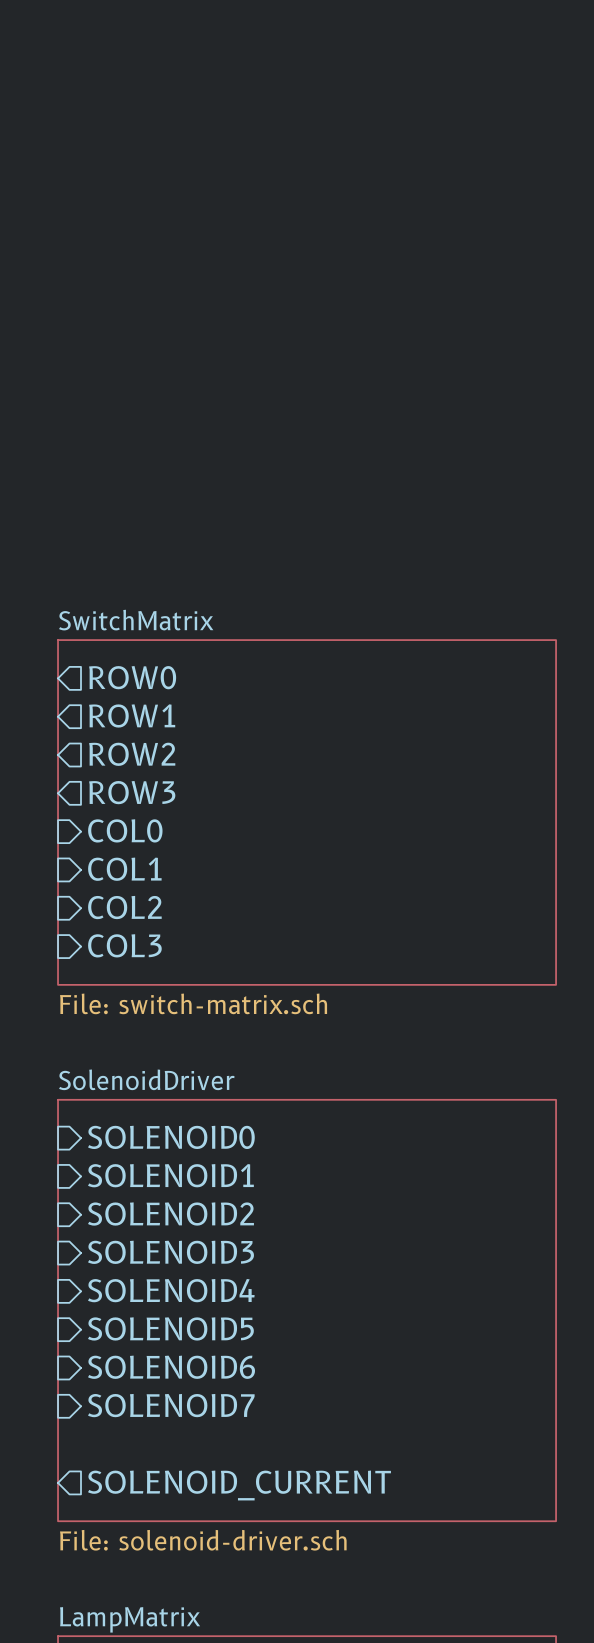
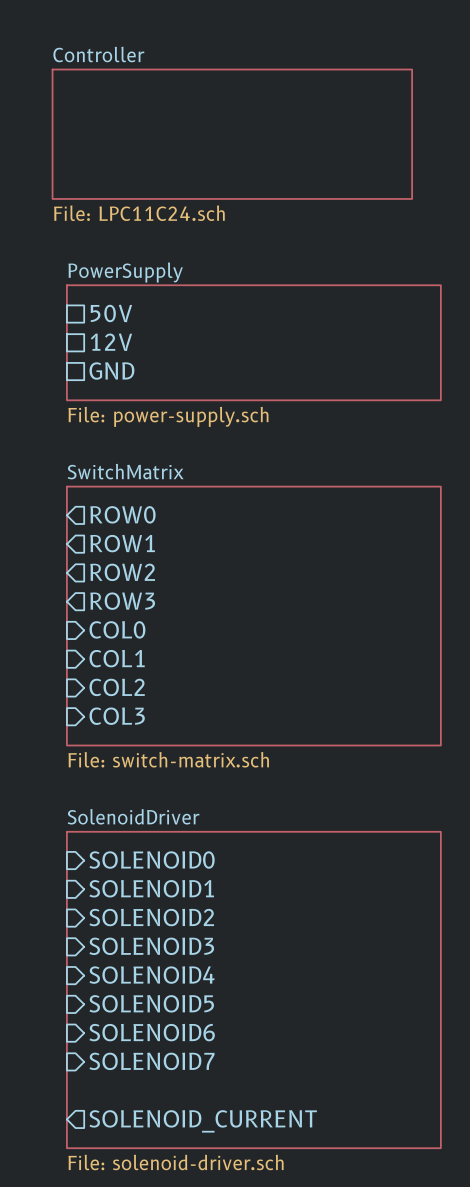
sheet Controller: none -> File: LPC11C24.sch (232, 134)
sheet pin: none -> 50V (111, 313)
sheet pin: none -> 12V (111, 342)
sheet PowerSupply: none -> File: power-supply.sch (253, 342)
sheet pin: none -> GND (111, 371)

